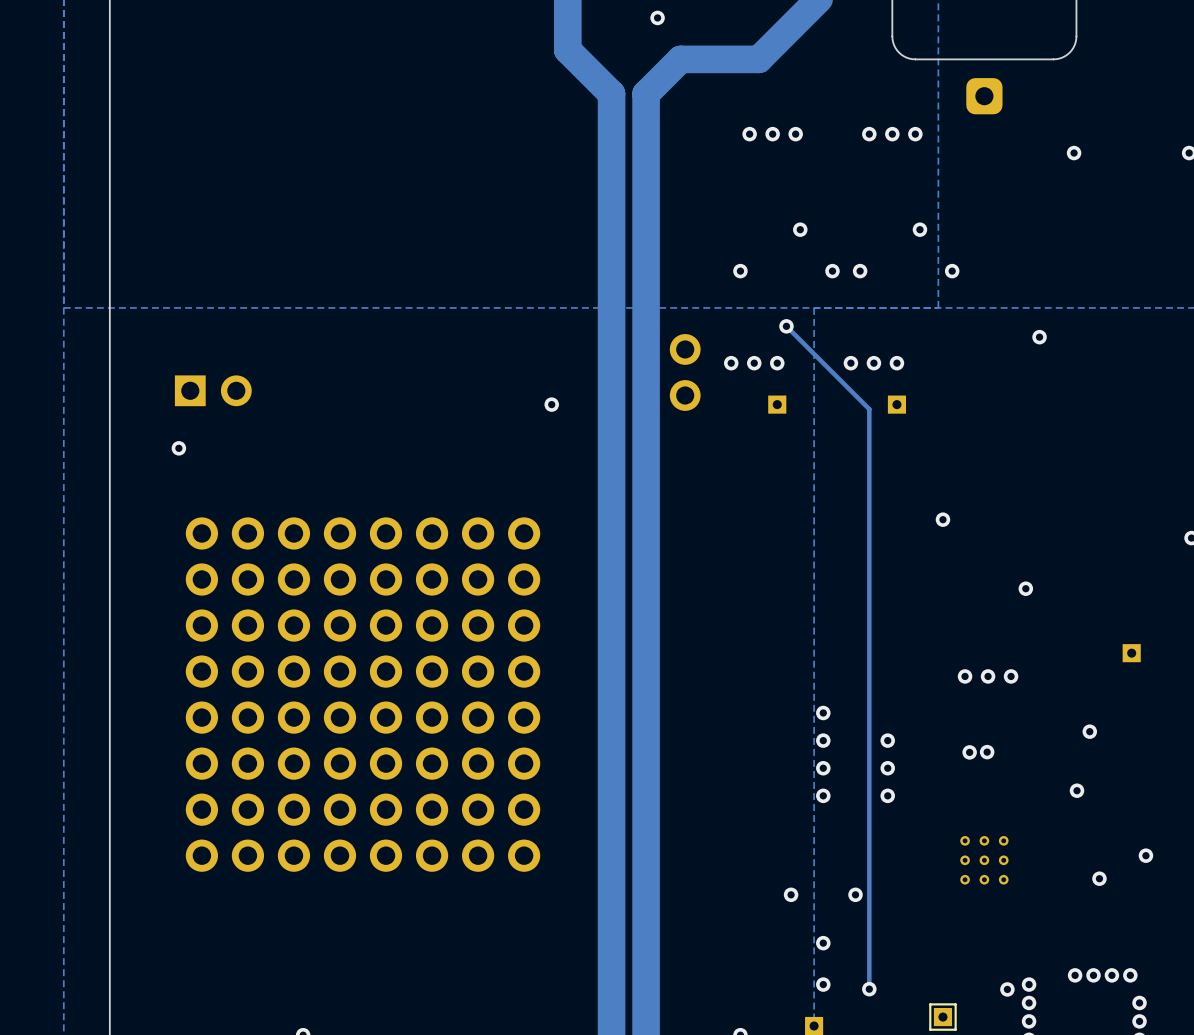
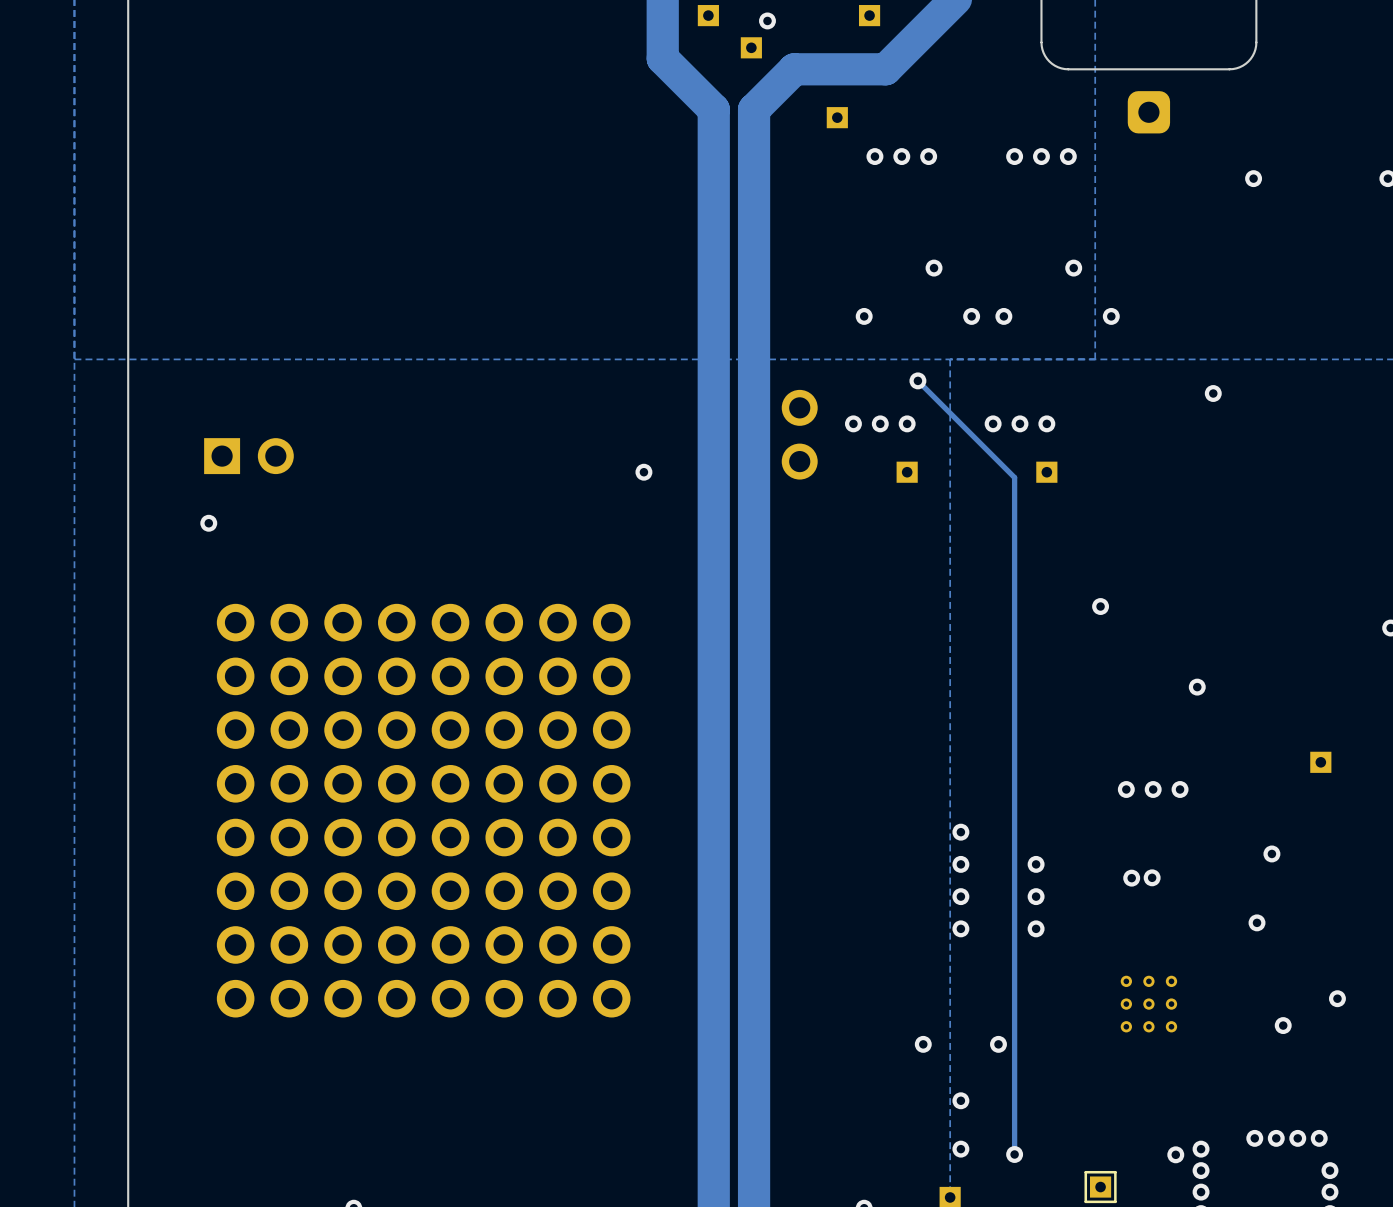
part: none -> (708, 15)
part: none -> (869, 15)
part: none -> (751, 47)
part: none -> (837, 117)

